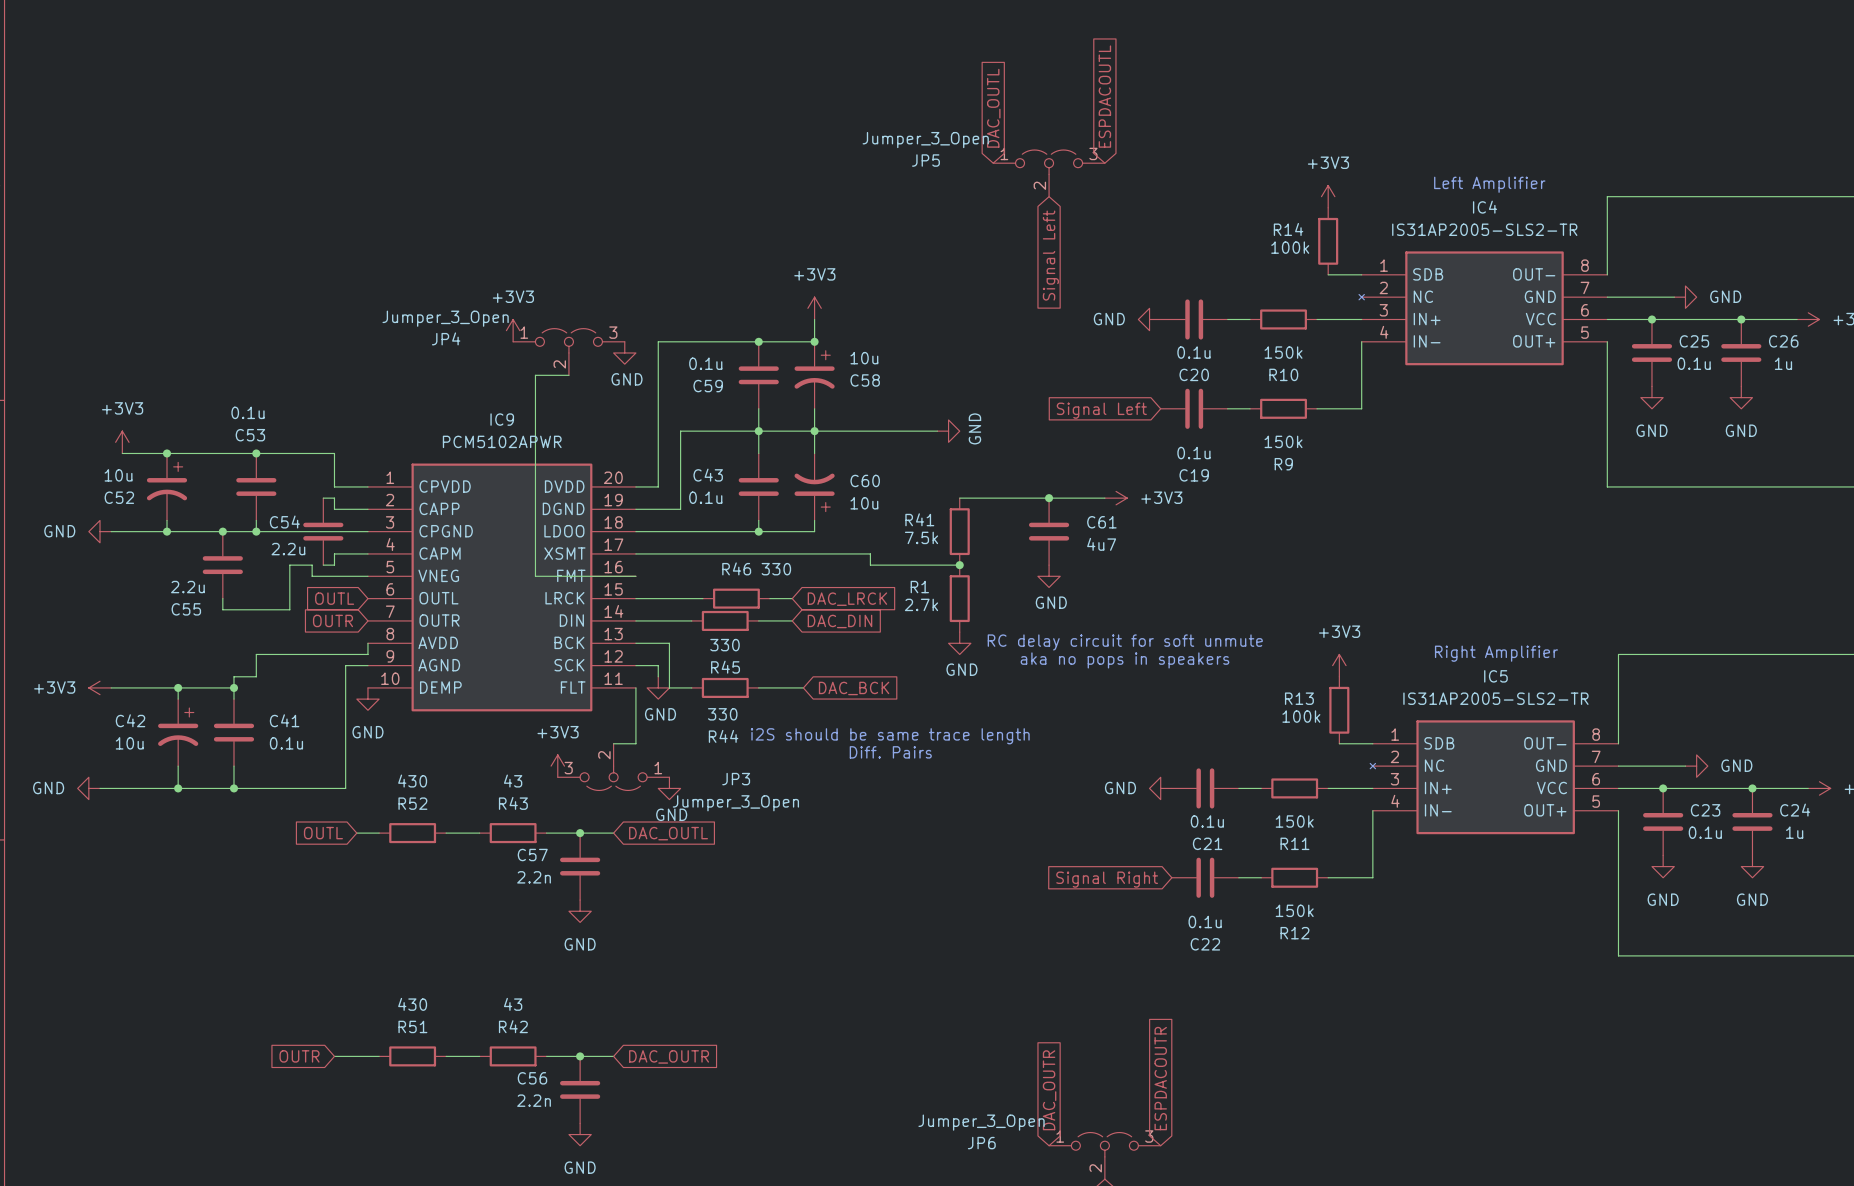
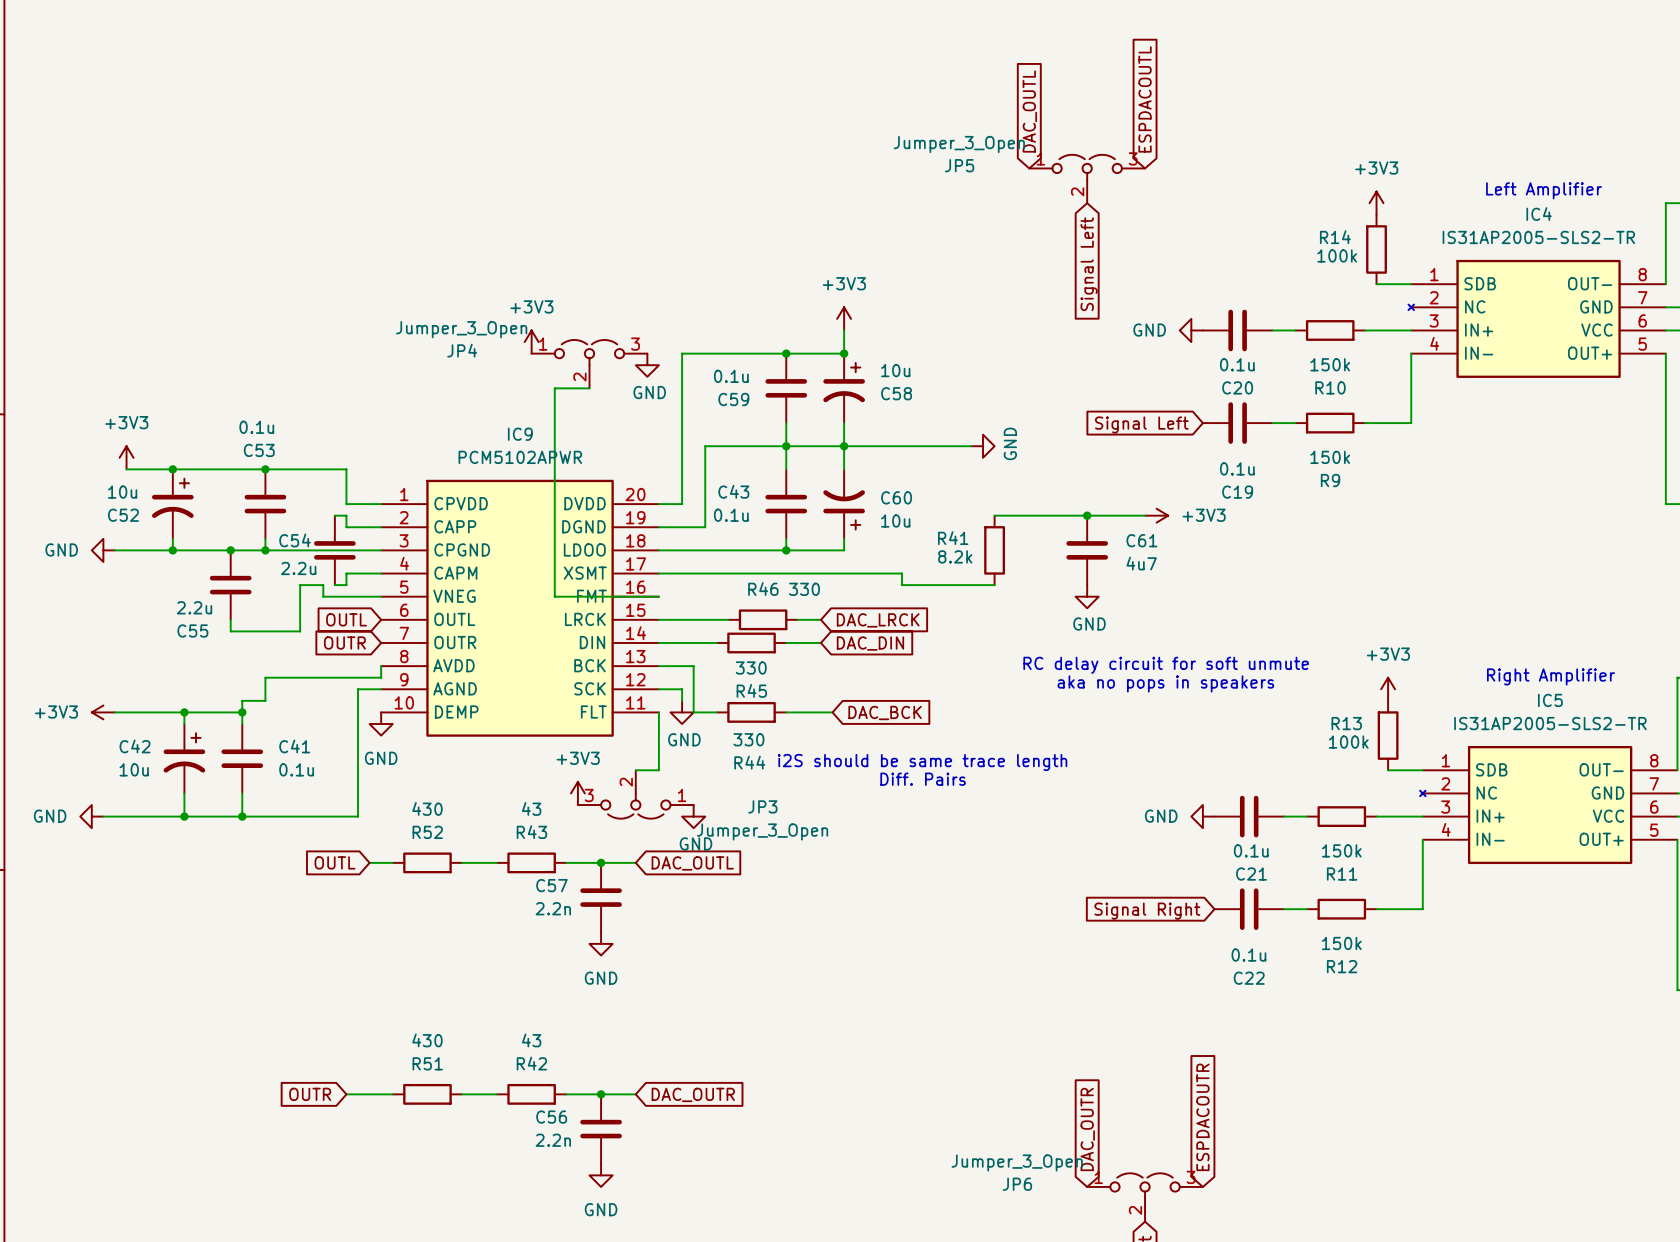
R41 value: 7.5k (921, 537) -> 8.2k (955, 556)
junction: (959, 565) -> none
R1: 2.7k (959, 598) -> none
power symbol: GND (959, 643) -> none

